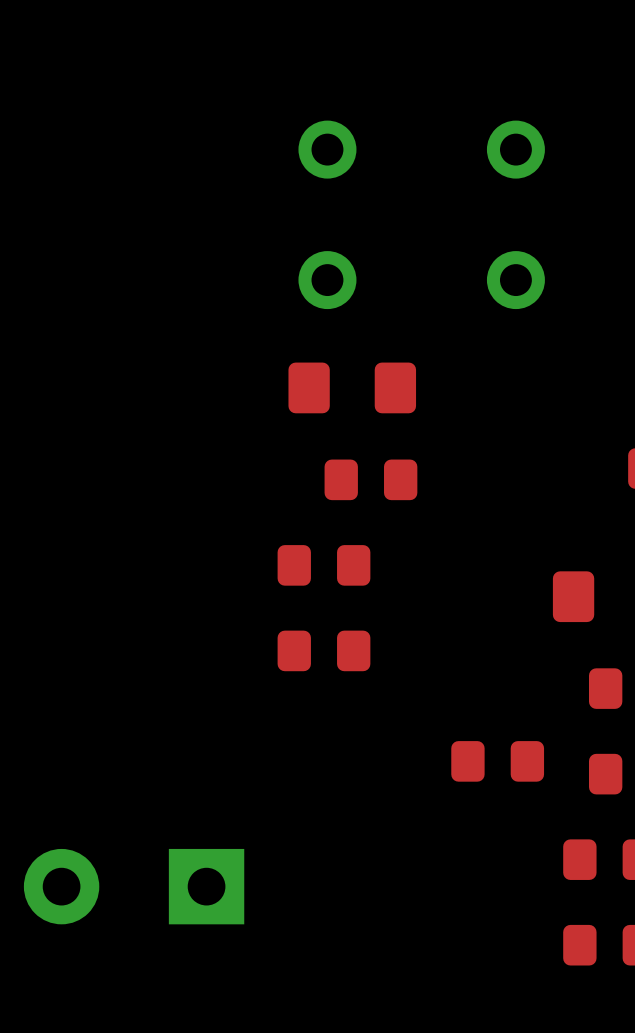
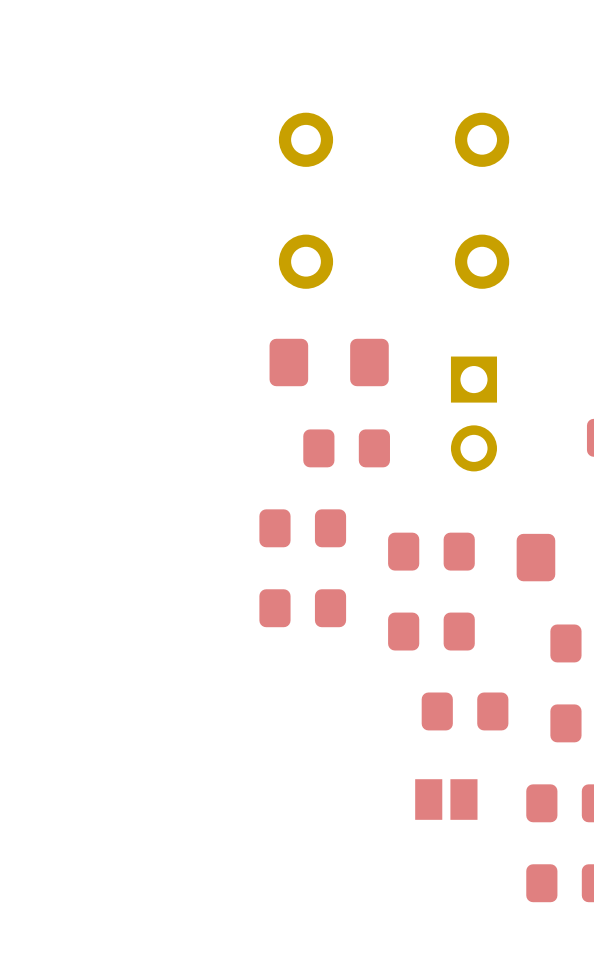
part: none -> (473, 413)
part: none -> (431, 551)
part: none -> (431, 631)
part: none -> (446, 799)
part: (134, 886) -> none

